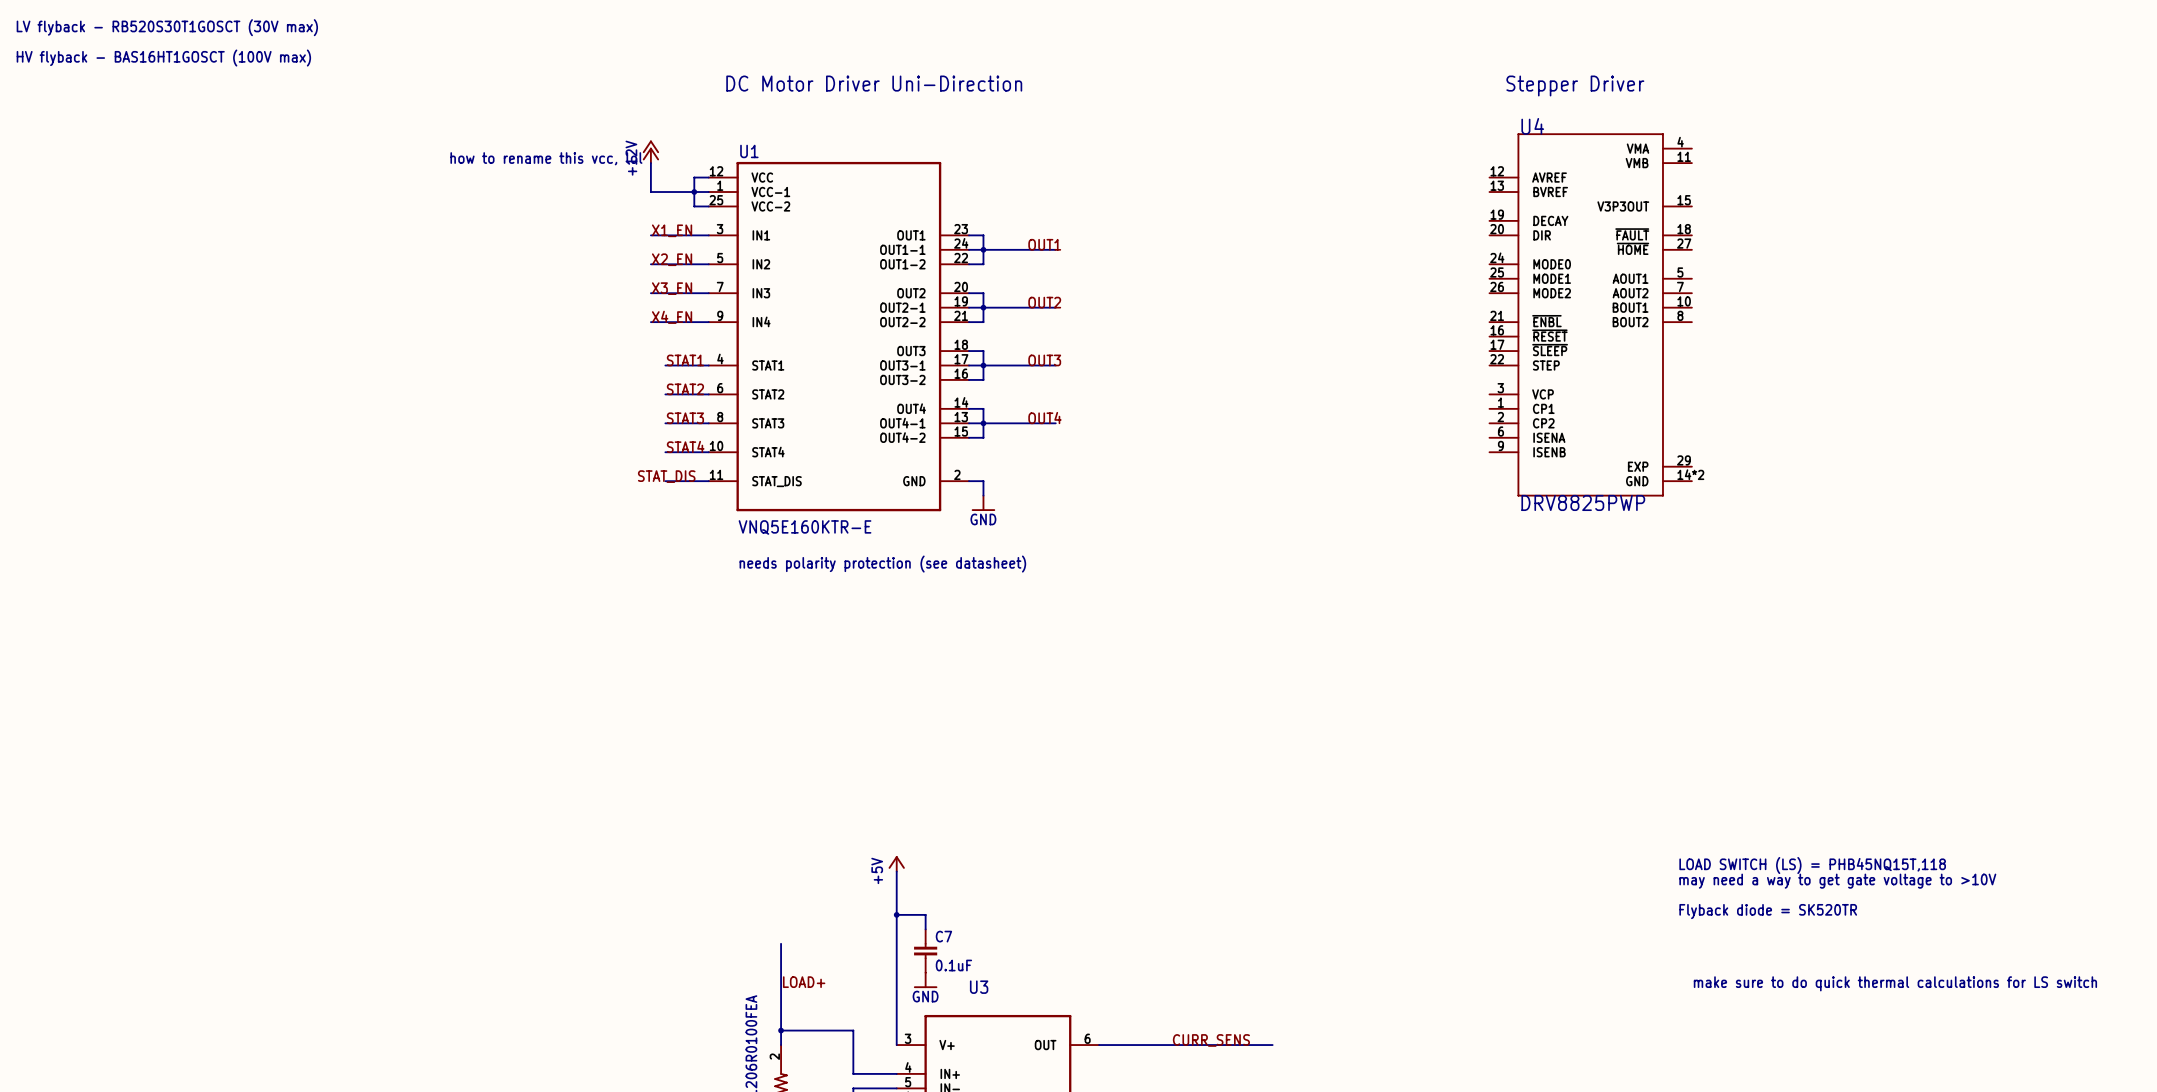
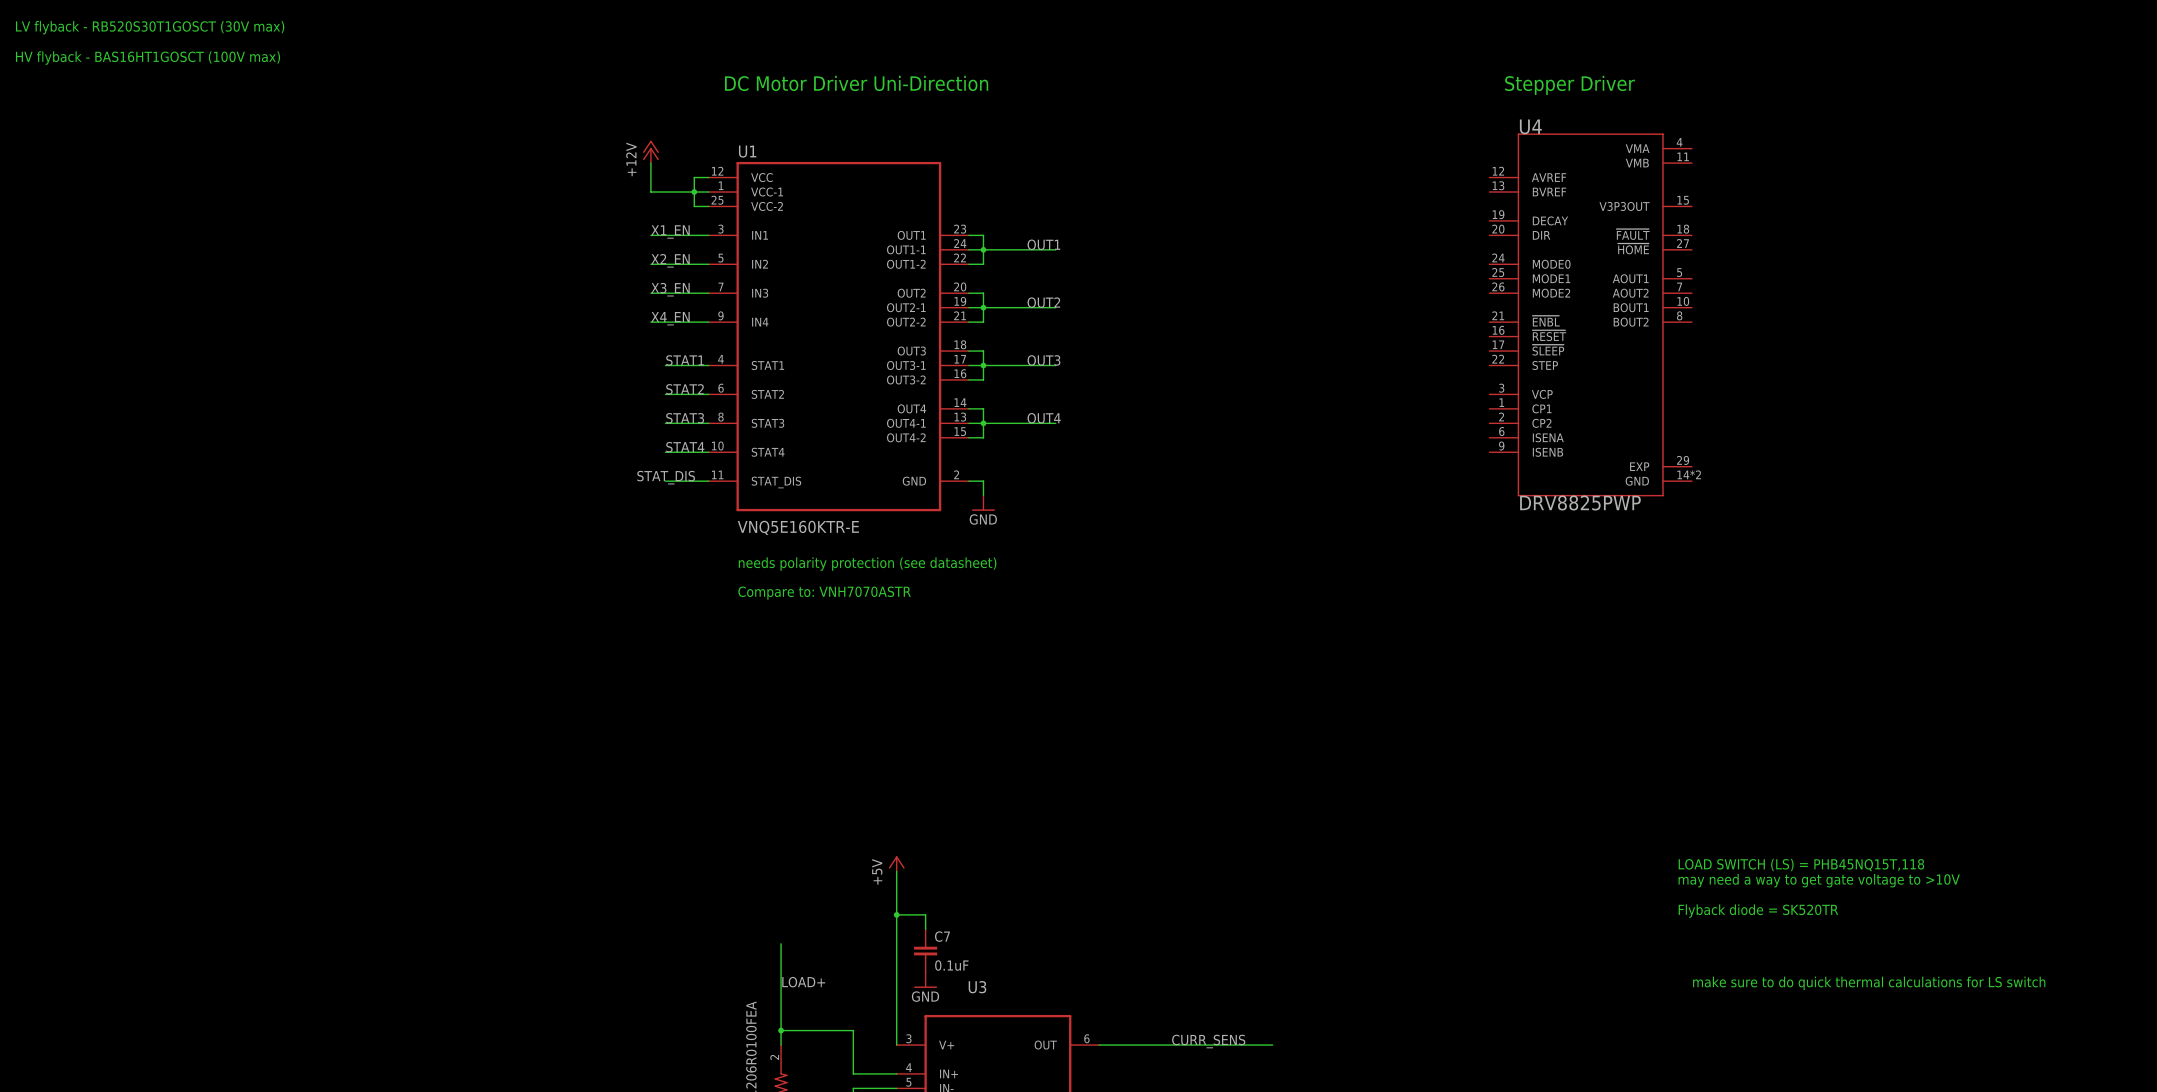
text: how to rename this vcc, lol (546, 158) -> none
text: none -> Compare to: VNH7070ASTR (824, 593)

